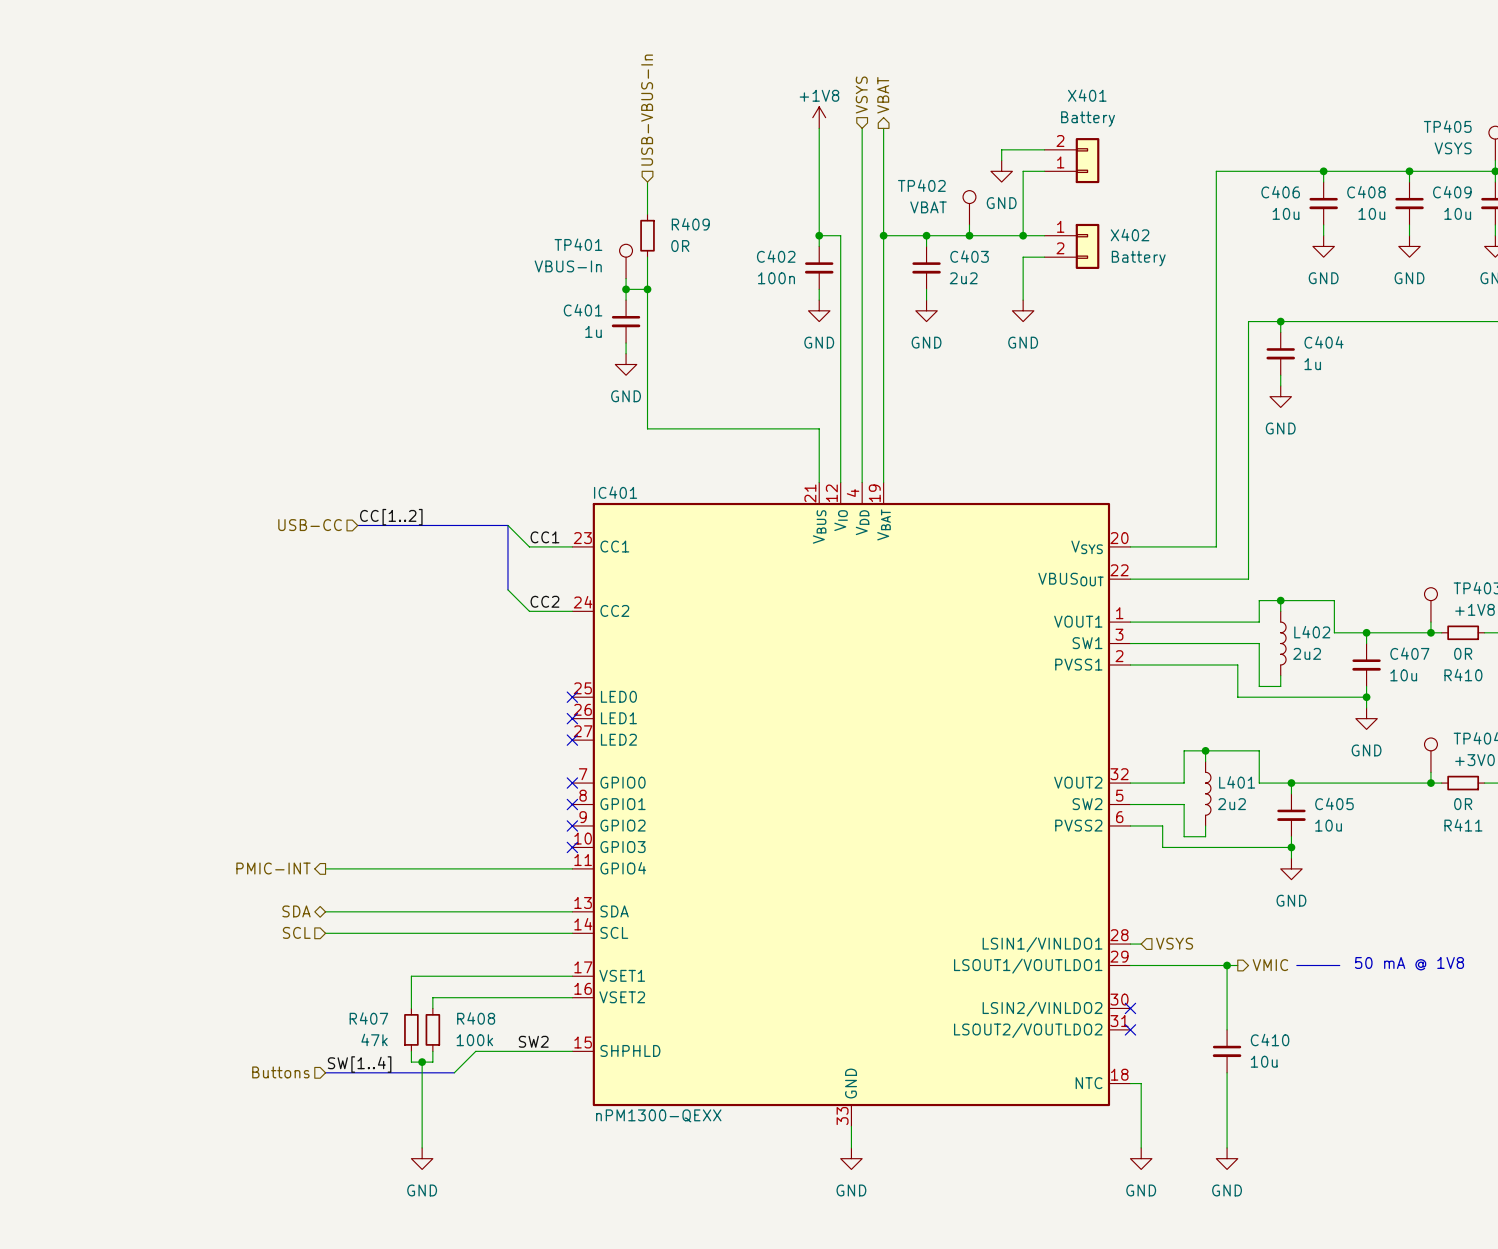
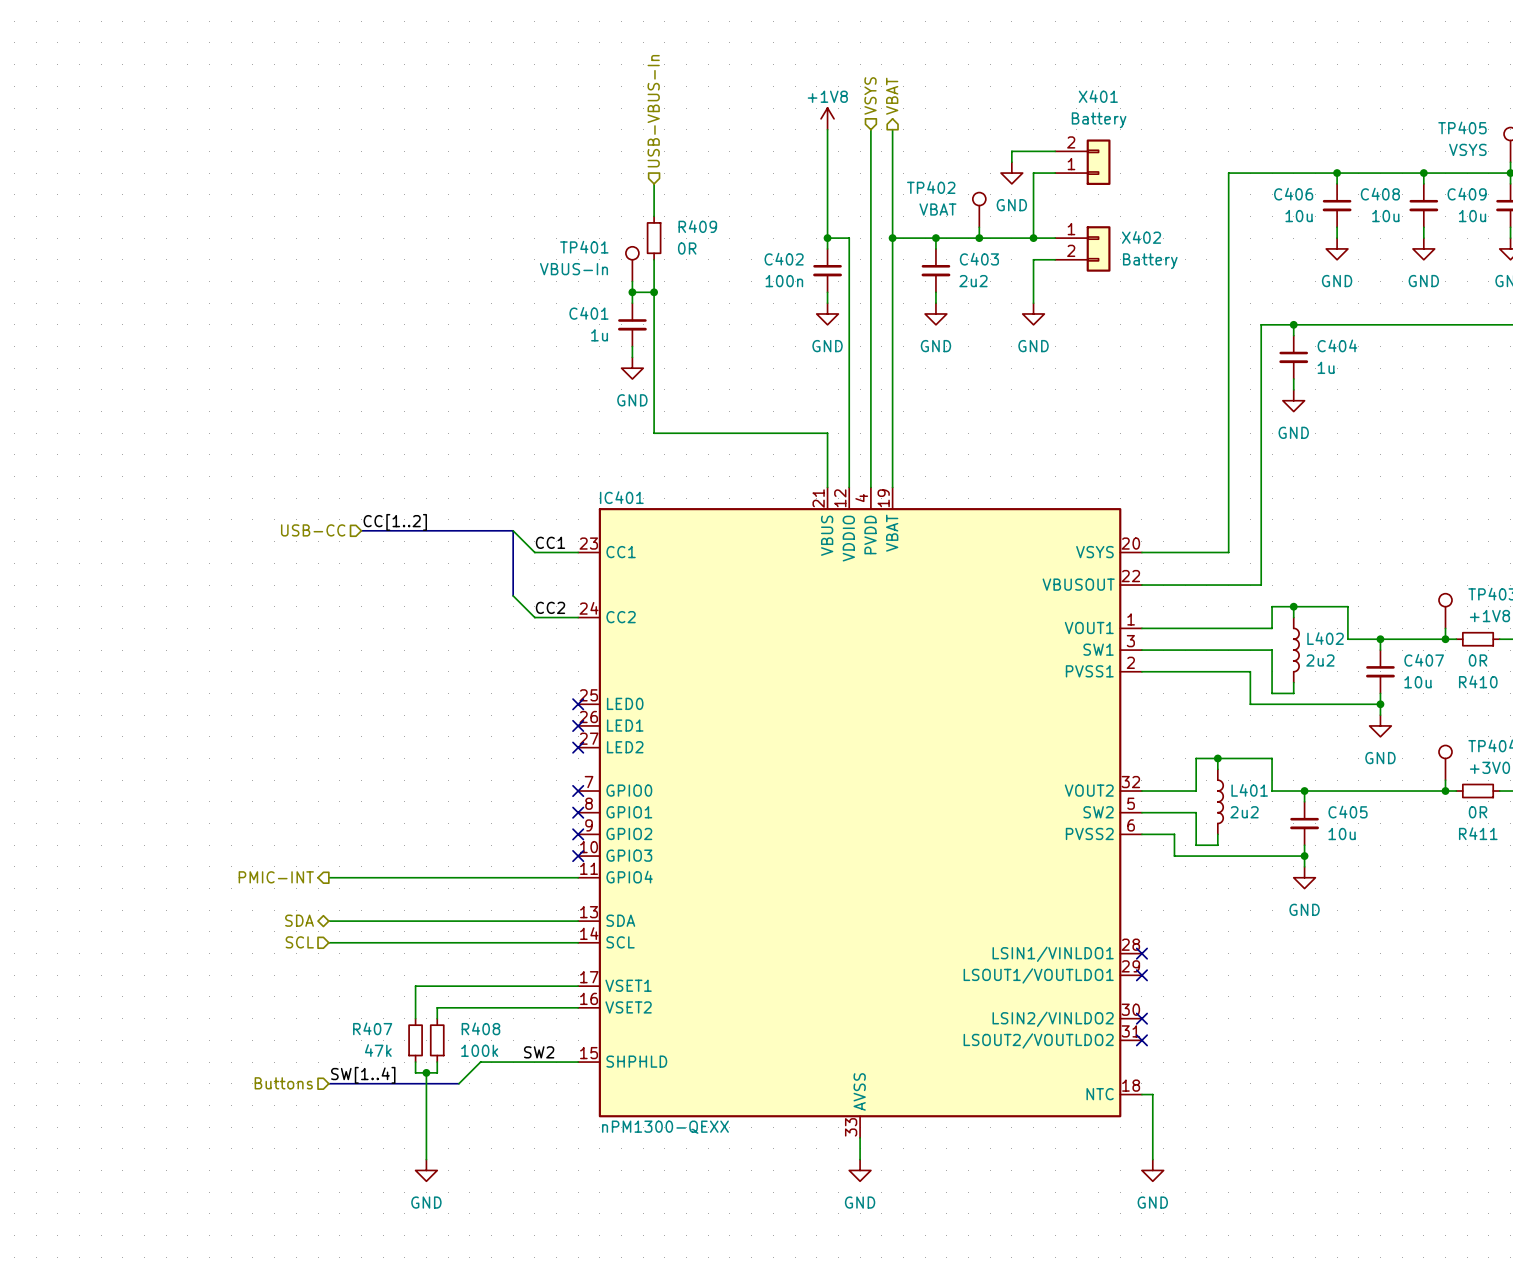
IC401 symbol: [572, 482, 1131, 1127] -> [578, 487, 1142, 1138]
hierarchical label: VSYS (1174, 943) -> none
wire: (1130, 944) (1141, 944) -> none
no-connect mark: none -> (1141, 953)
text: 50 mA @ 1V8 (1409, 963) -> none
wire: (1130, 965) (1237, 965) -> none
no-connect mark: none -> (1141, 975)
wire: (1227, 965) (1227, 1029) -> none
junction: (1227, 965) -> none
hierarchical label: VMIC (1270, 965) -> none
line: (1296, 965) (1339, 965) -> none
C410: 10u (1227, 1051) -> none
wire: (1227, 1072) (1227, 1147) -> none
power symbol: GND (1227, 1158) -> none

